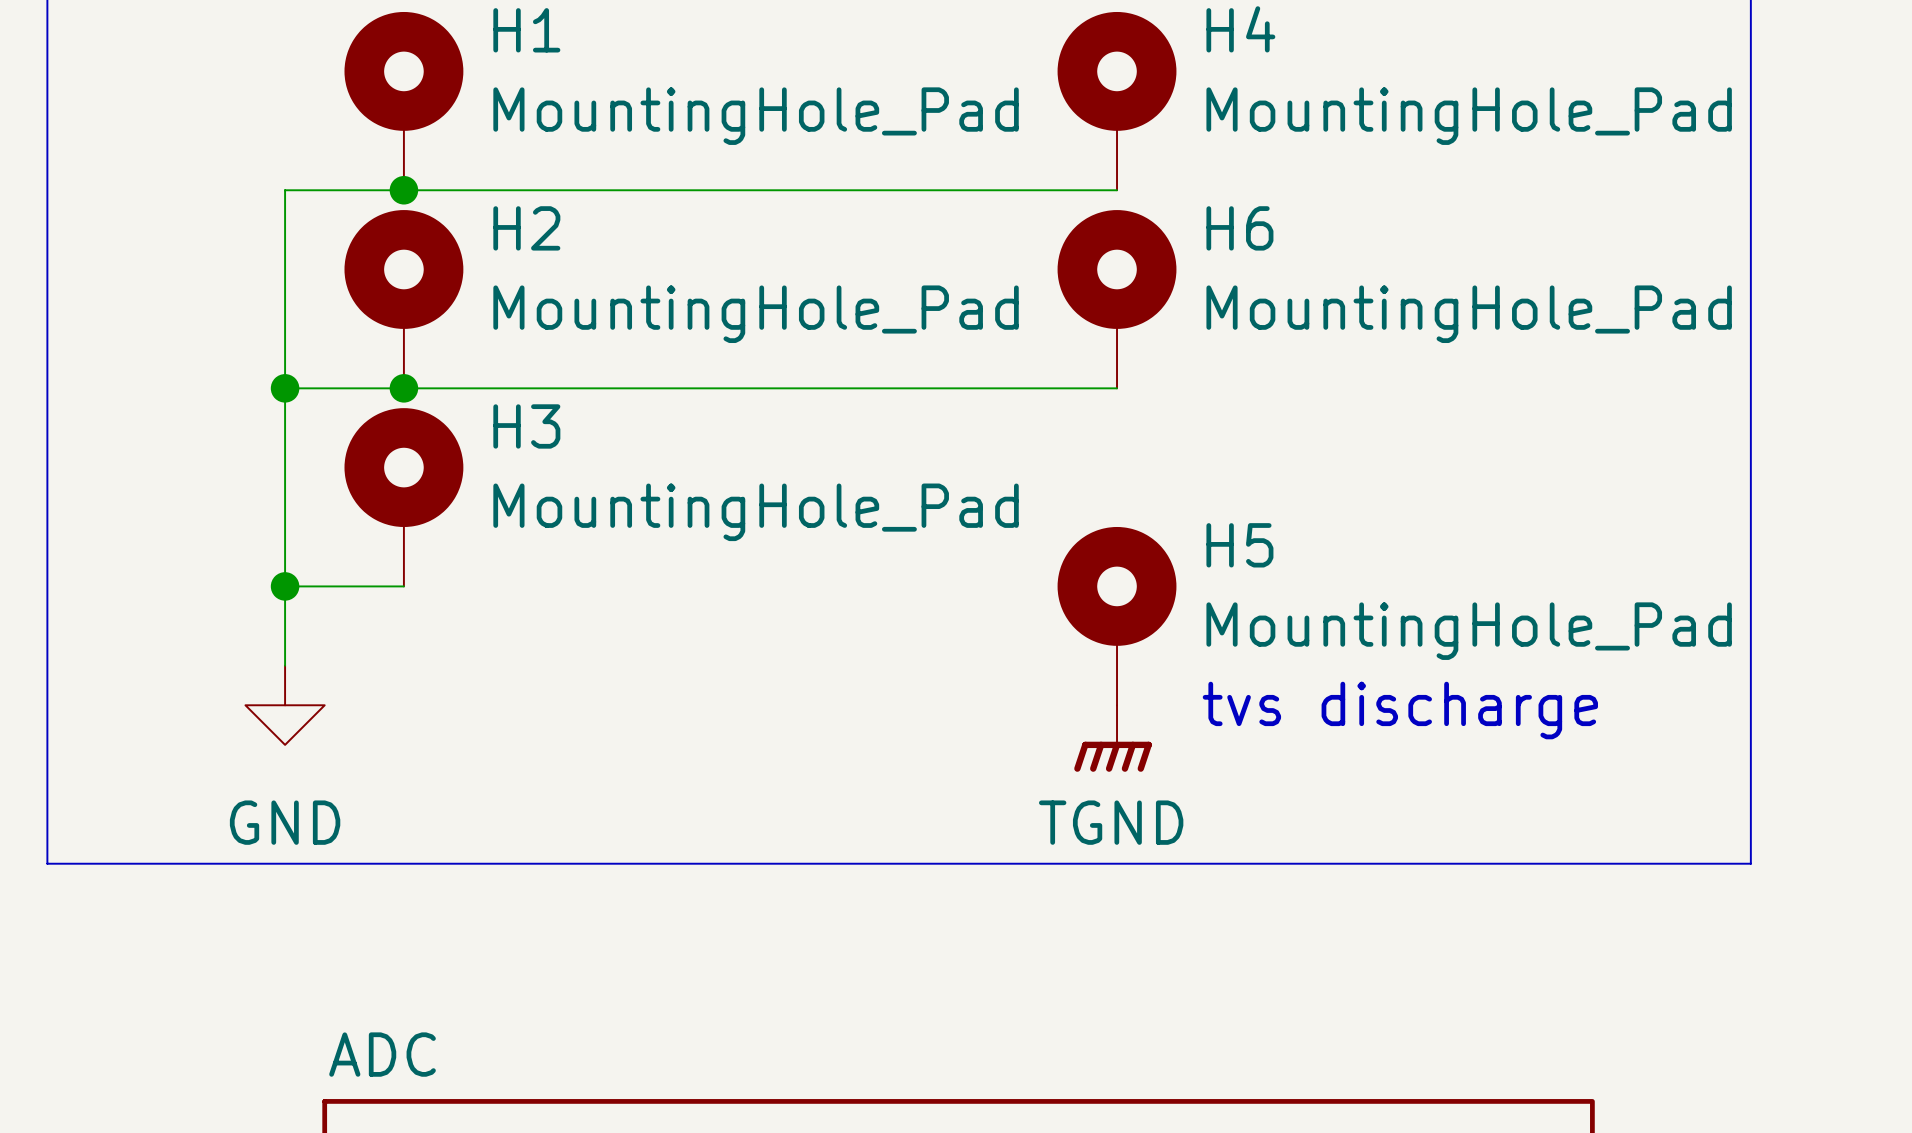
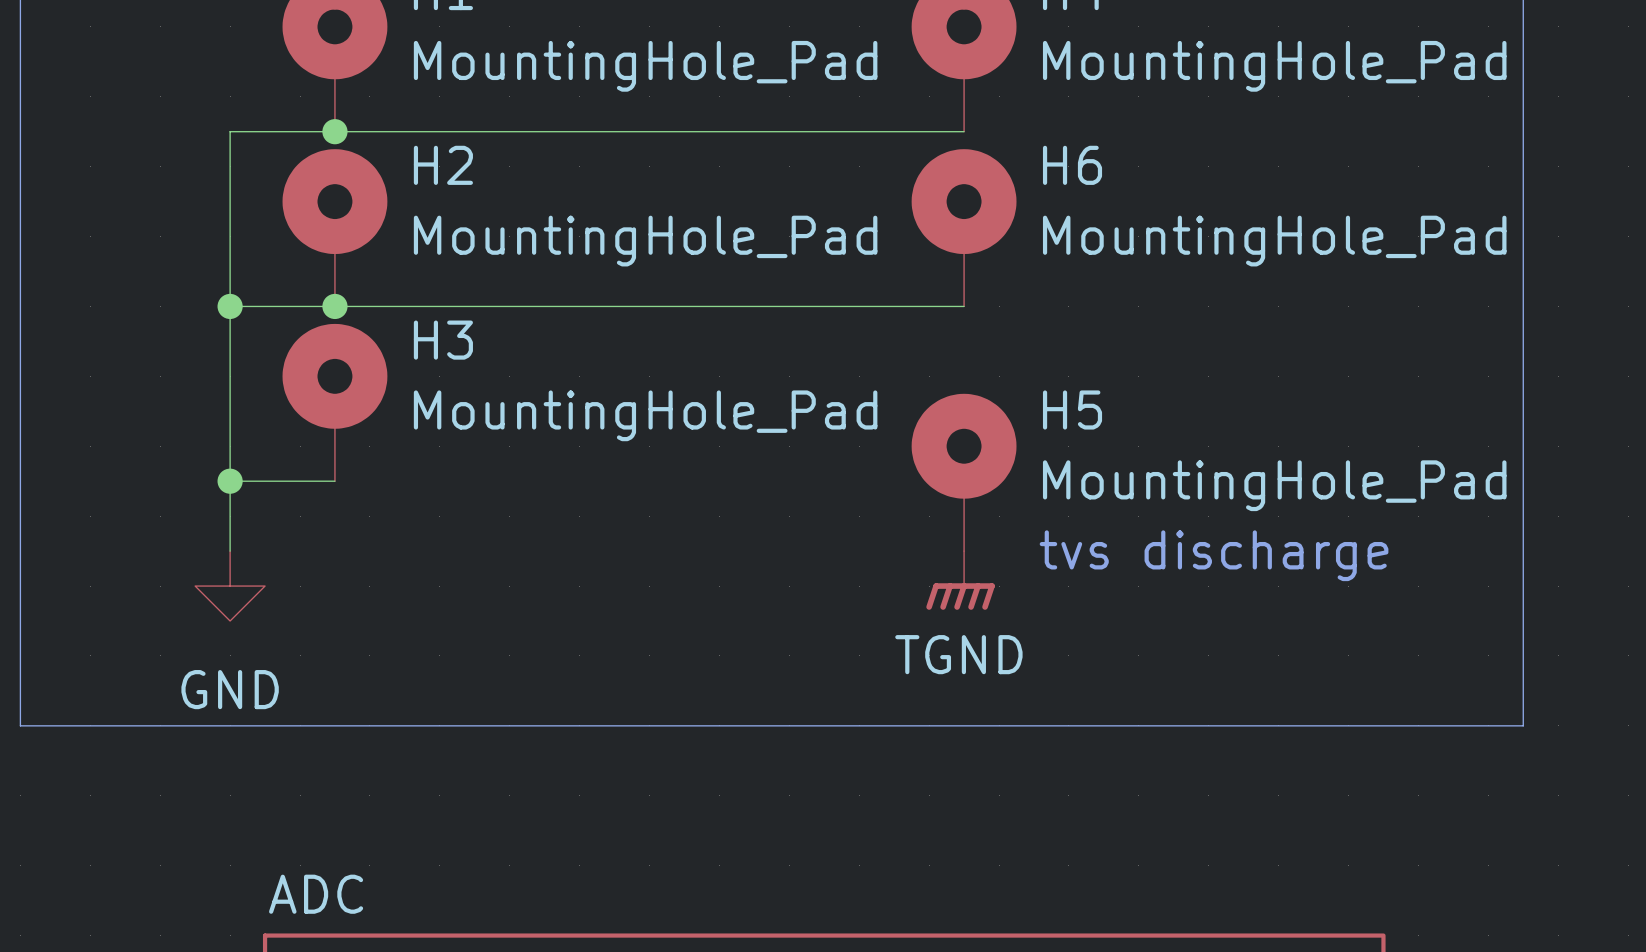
H5 position: (1117, 616) -> (964, 472)
text position: tvs discharge (1400, 710) -> tvs discharge (1214, 555)
power symbol position: TGND (1113, 738) -> TGND (960, 580)

